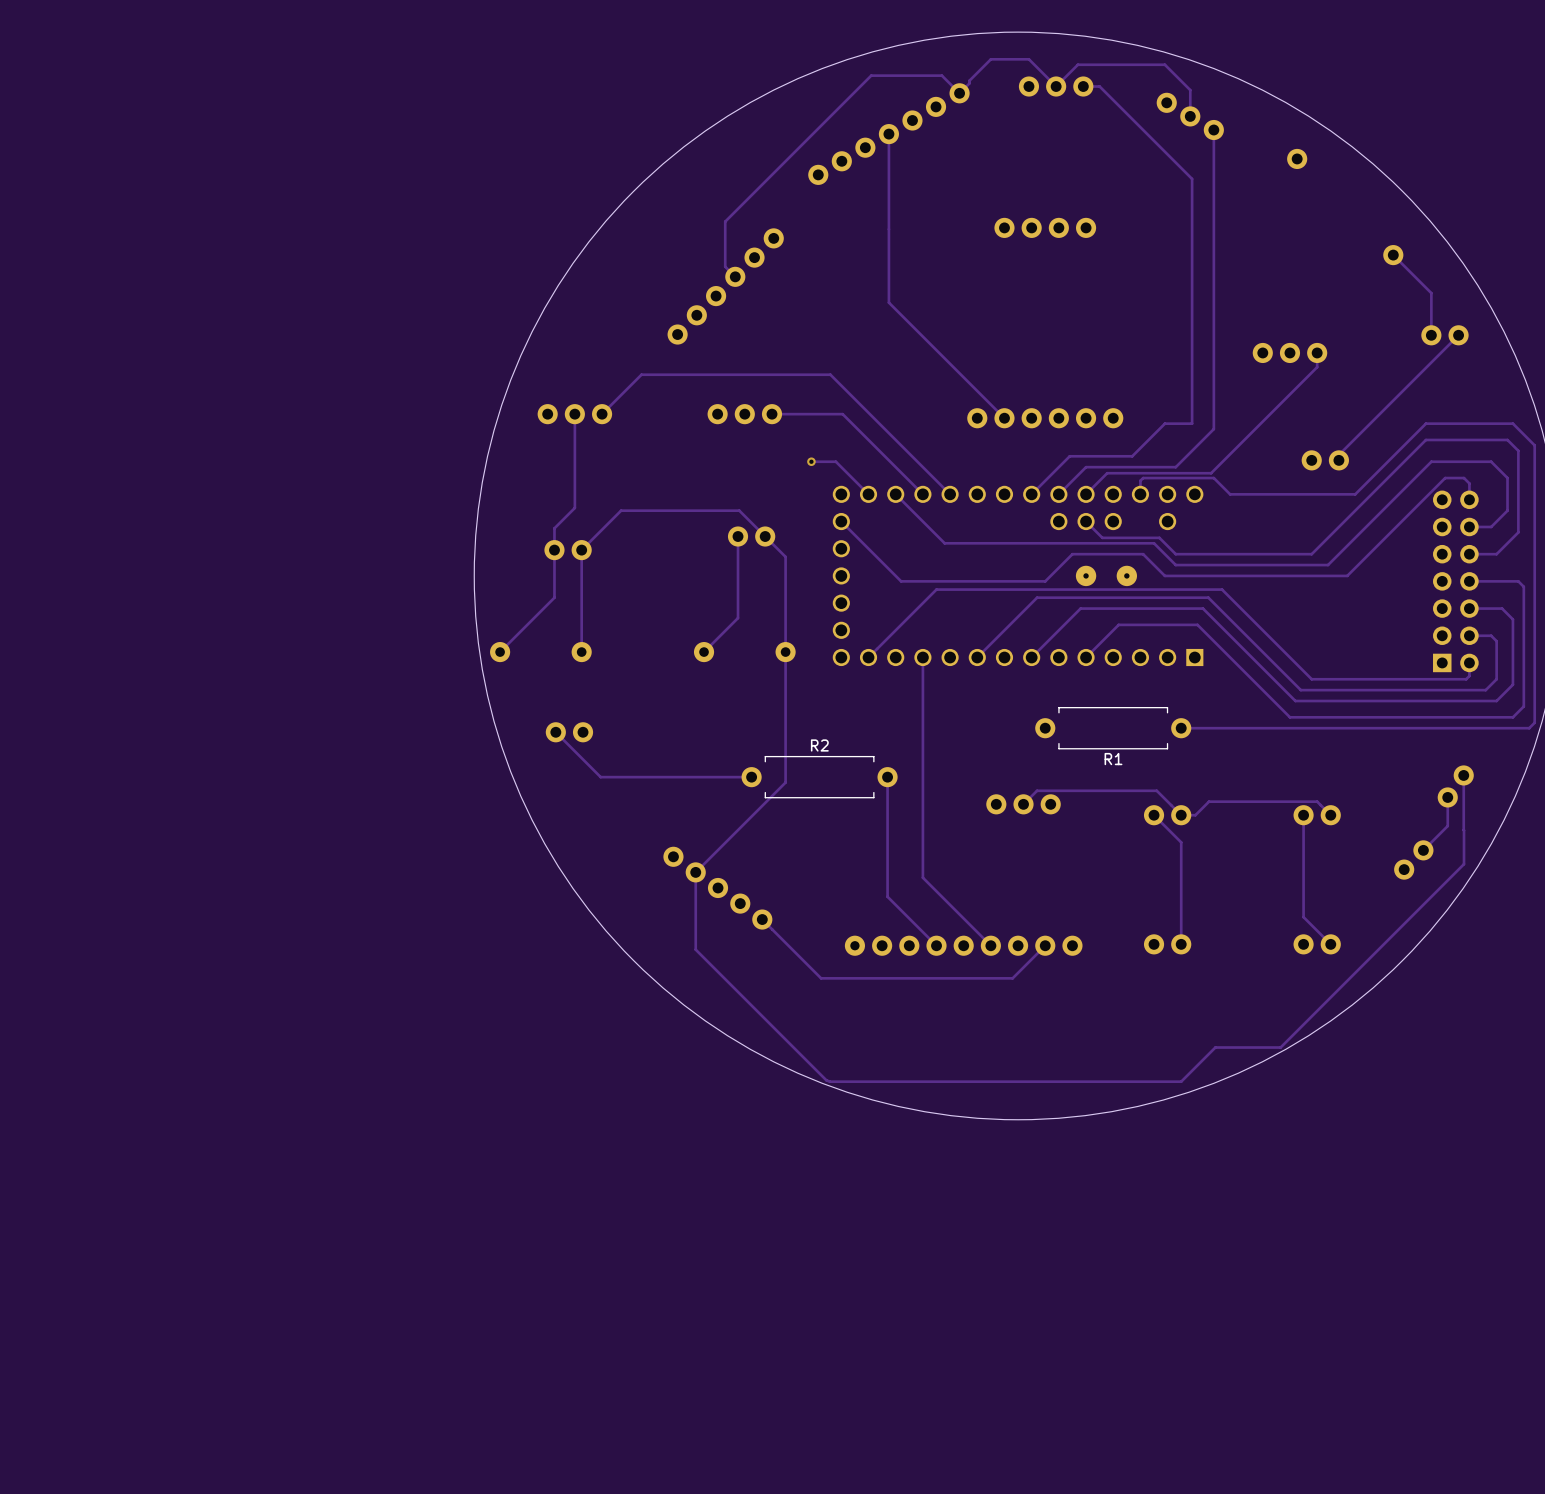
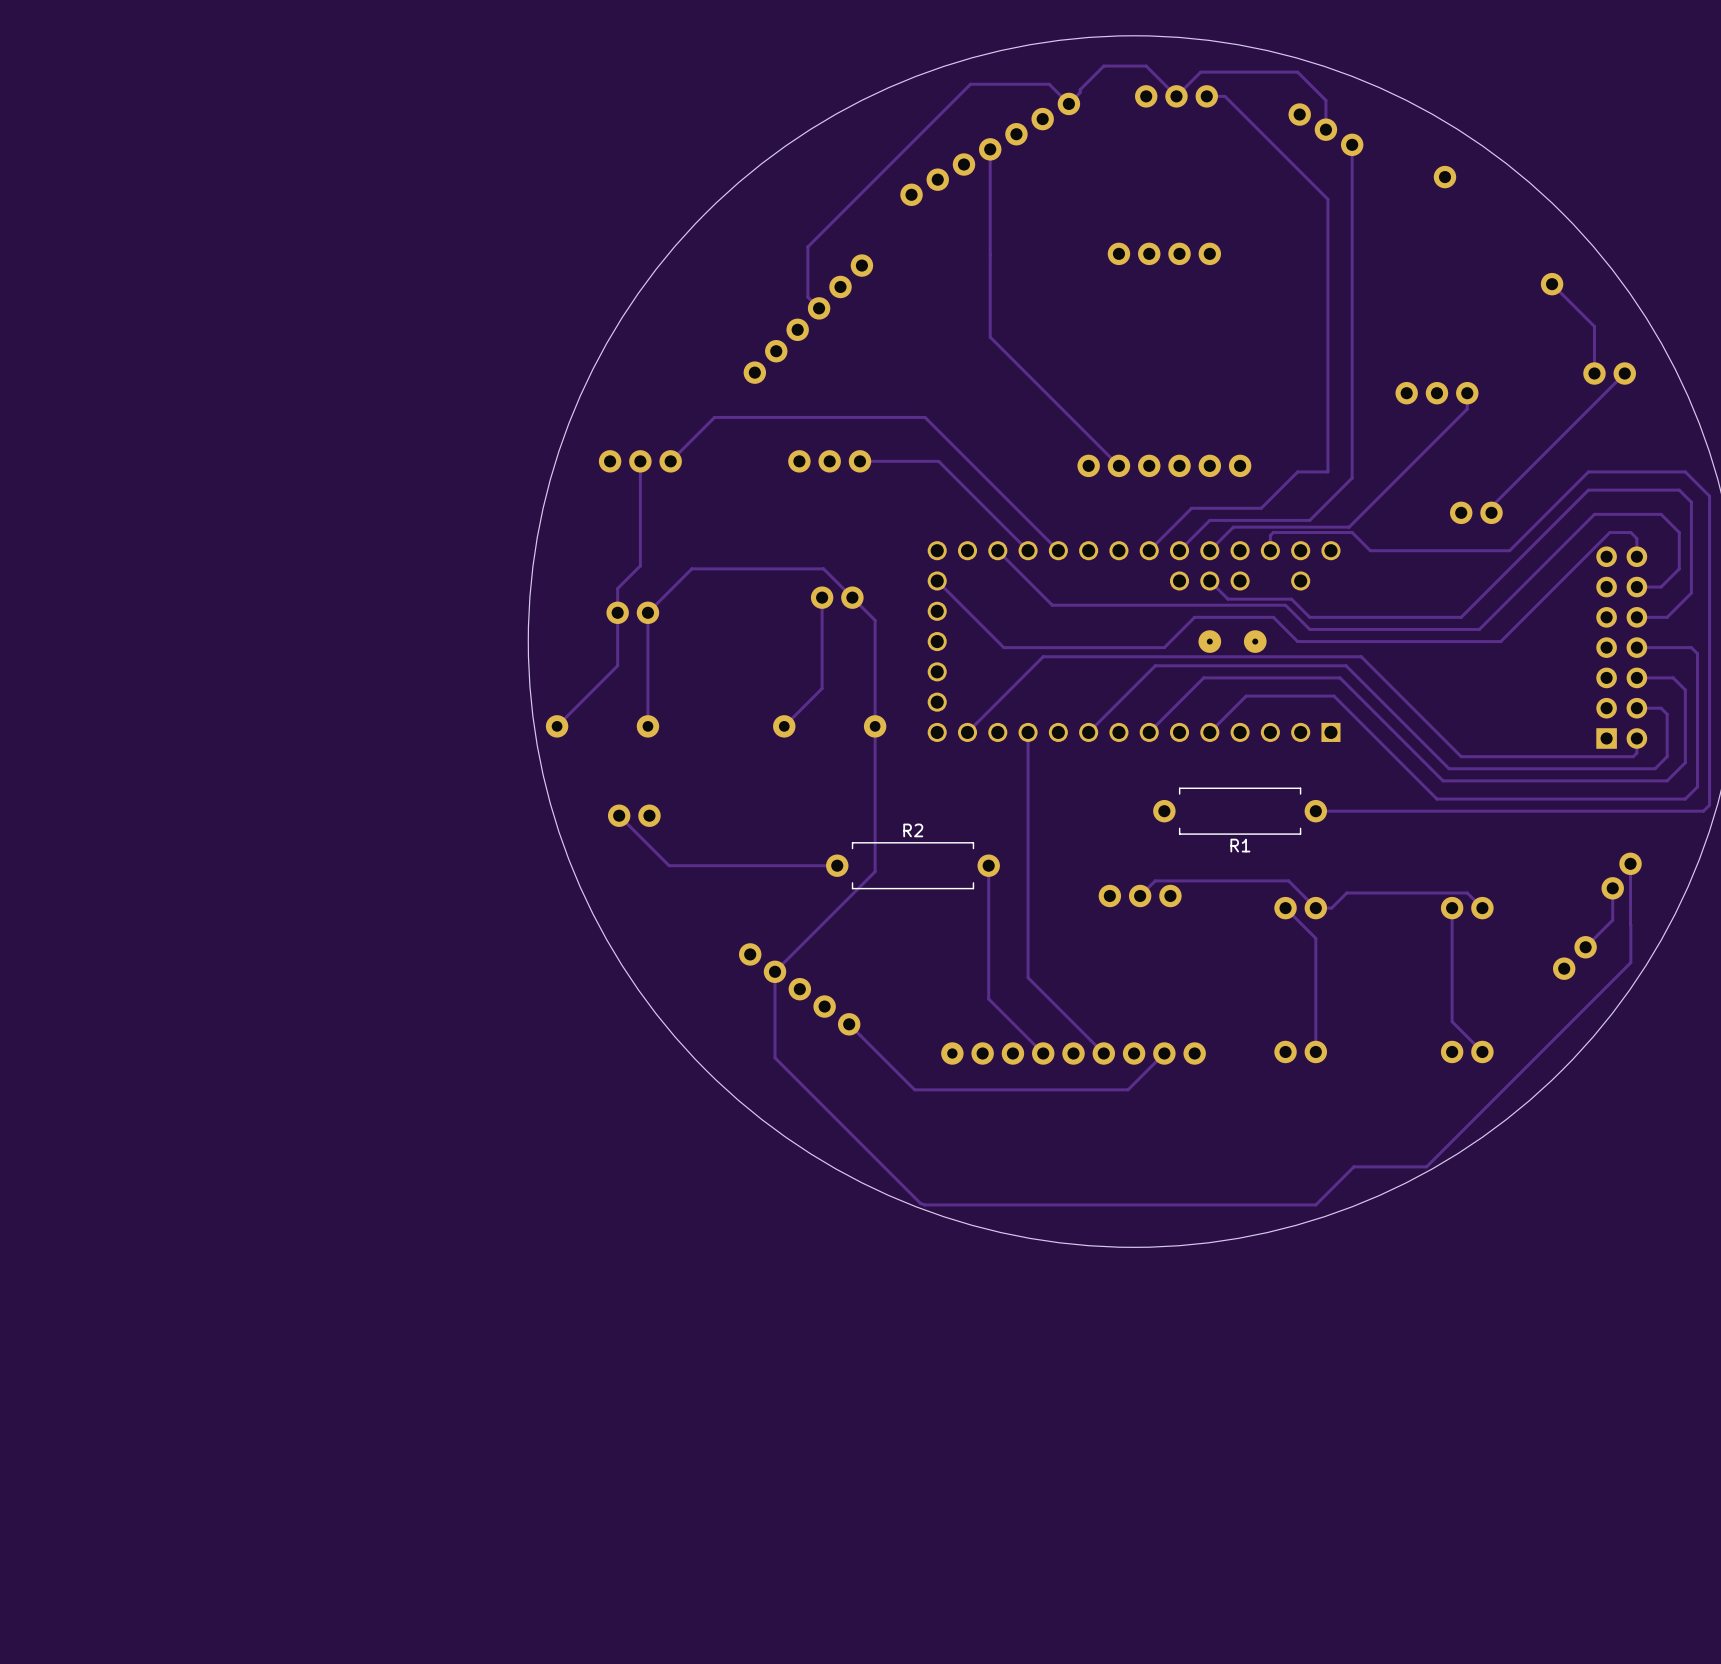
track: (811, 461) (835, 461) (868, 494) -> none
via: (811, 461) -> none

